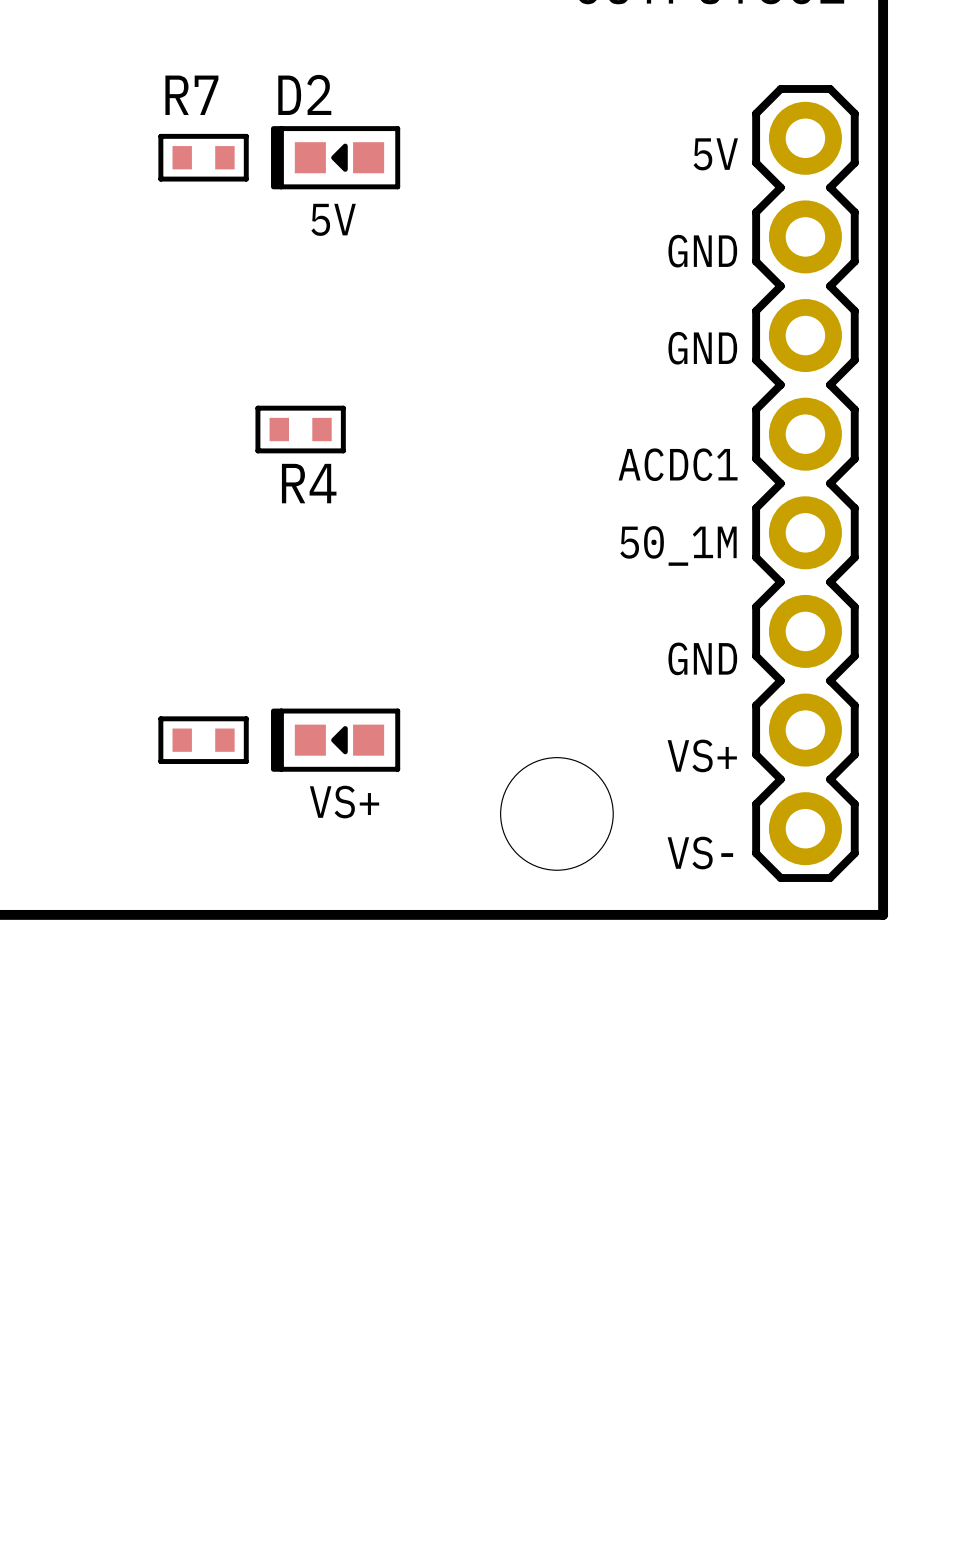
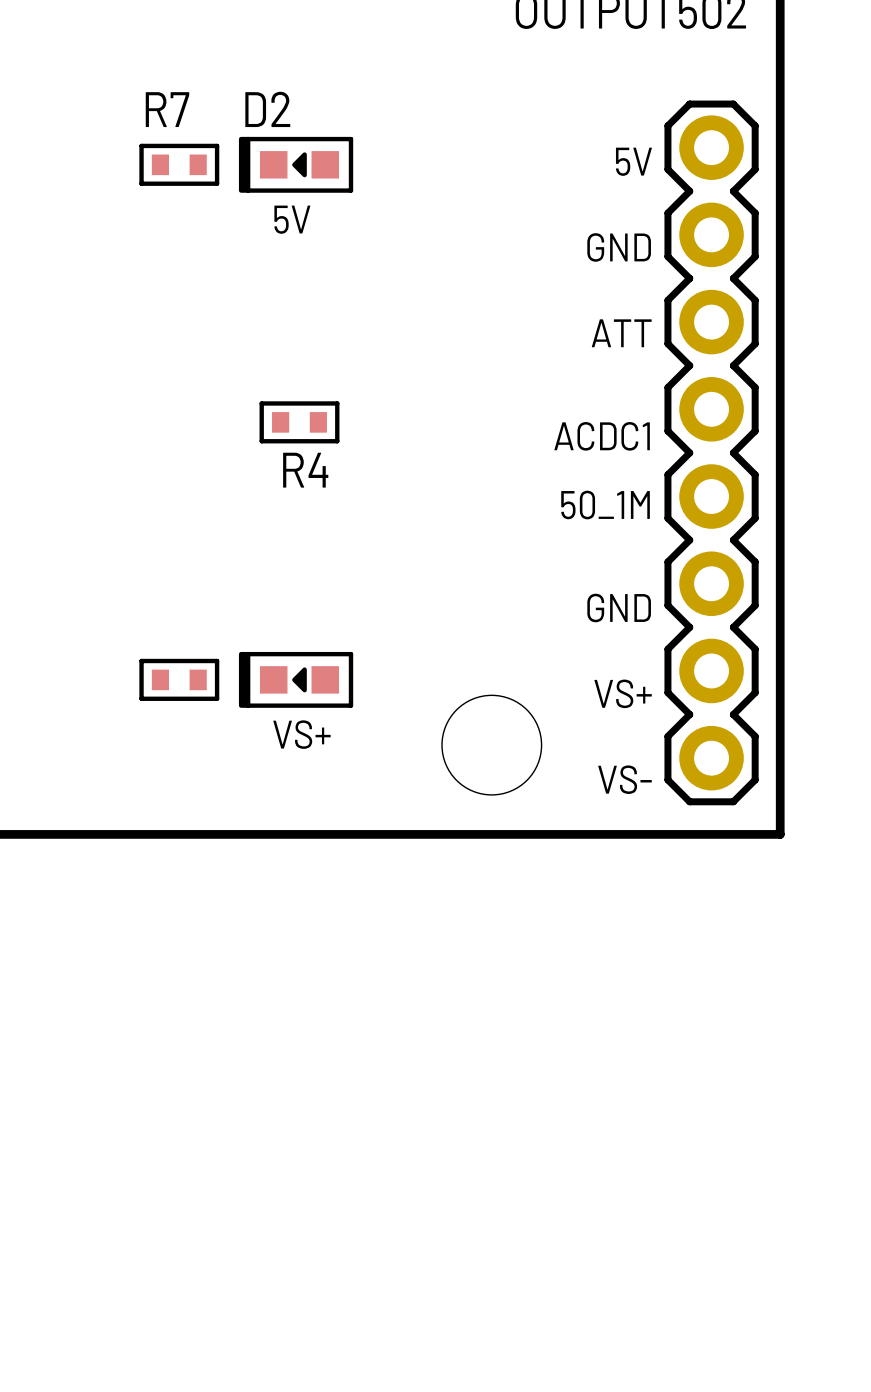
text: GND (702, 348) -> ATT (621, 333)
R4 position: (300, 429) -> (299, 422)

